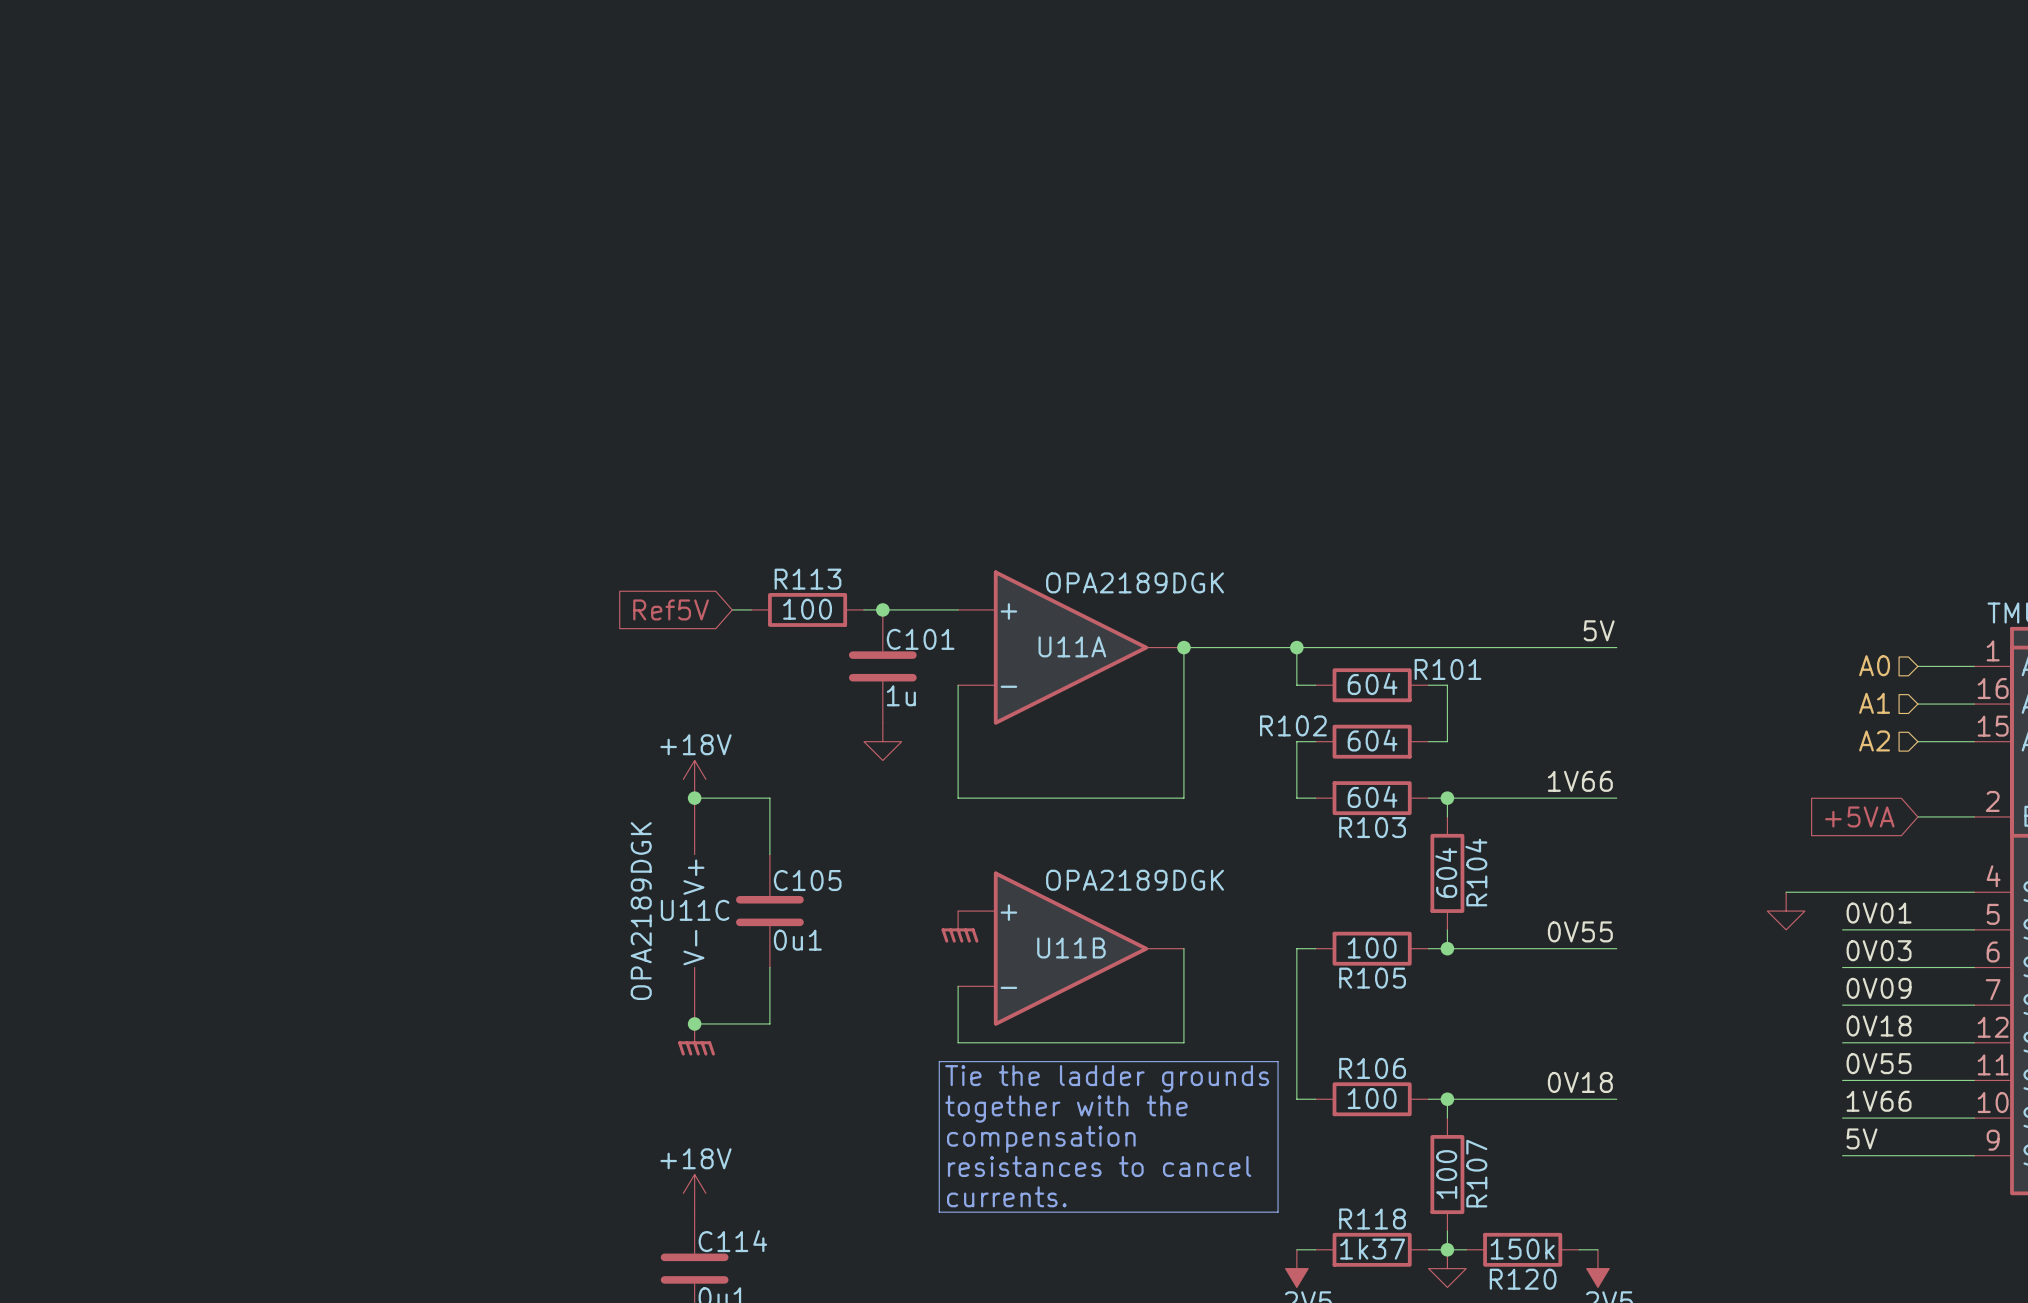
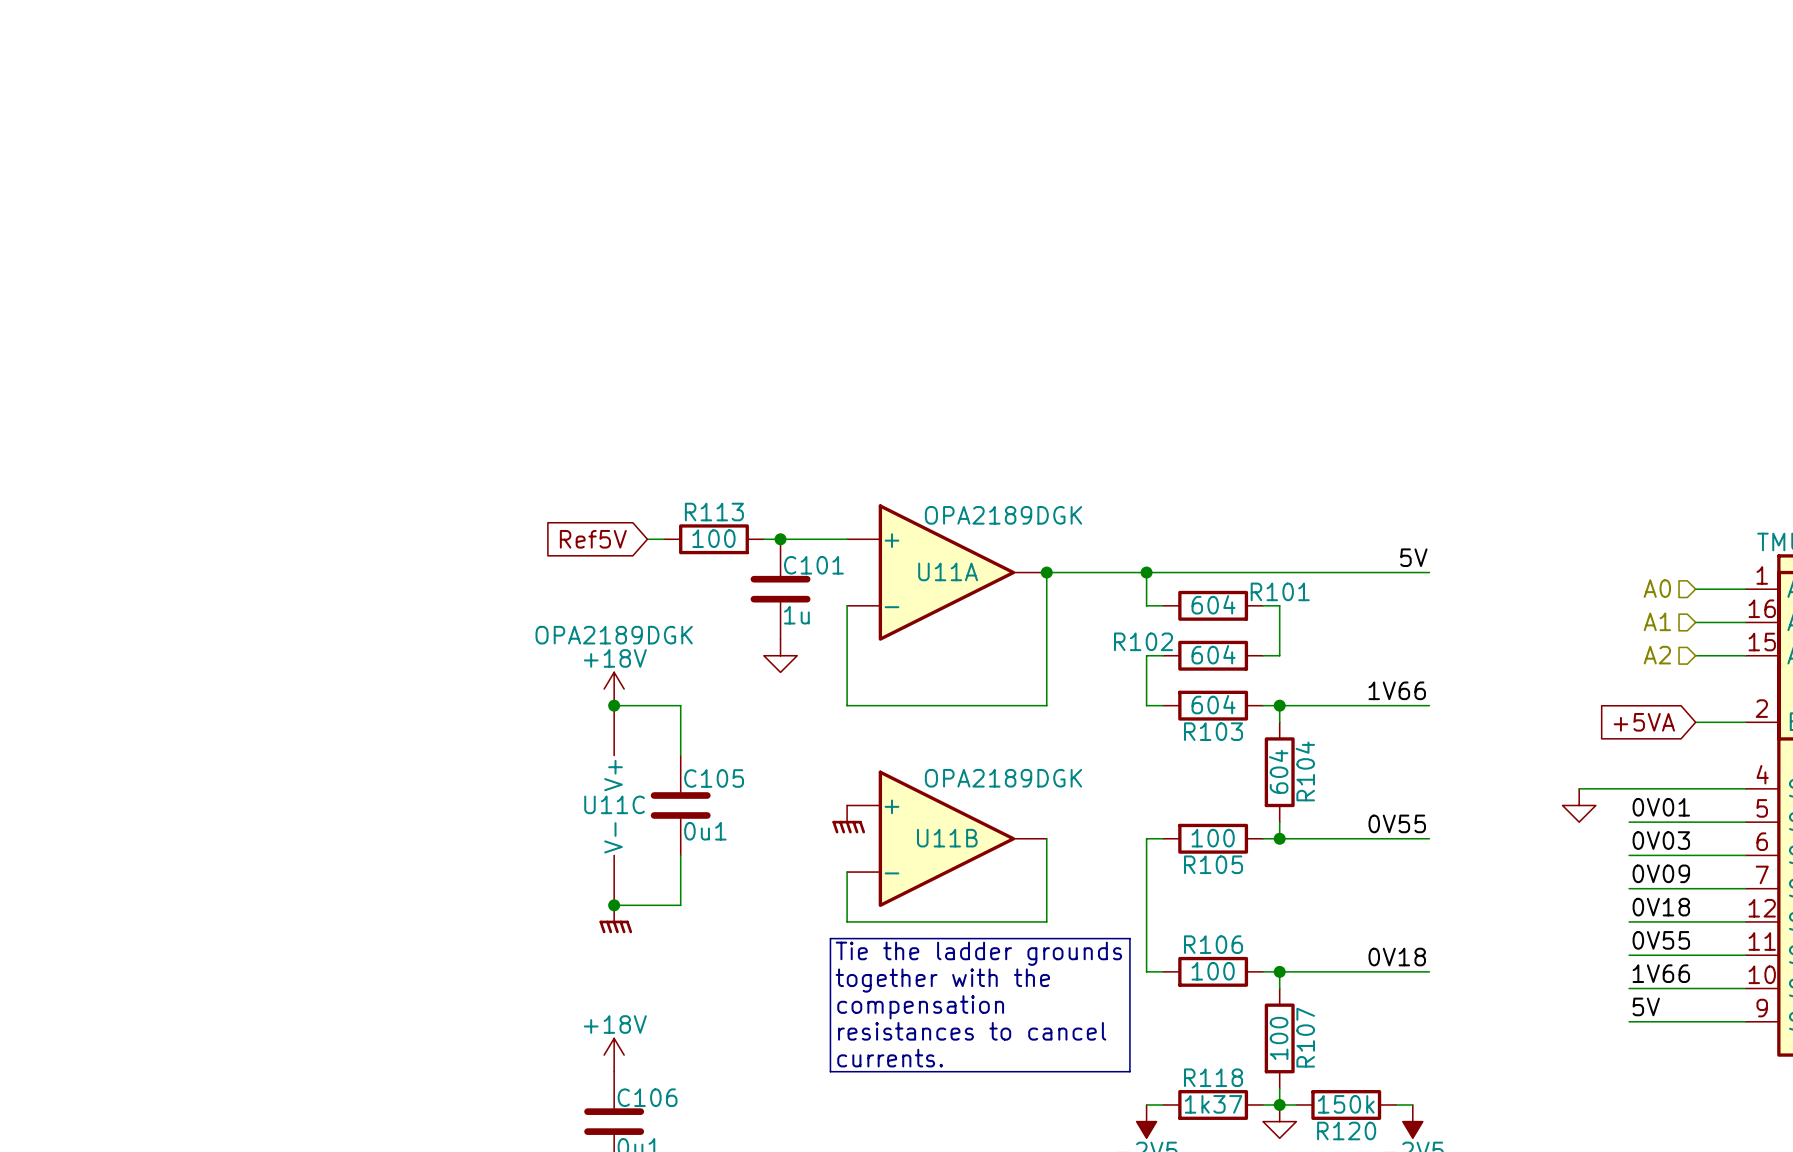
U11C value rotation: 0° (641, 911) -> 90° clockwise (614, 635)
C114 name: C114 (732, 1241) -> C106 (647, 1097)

